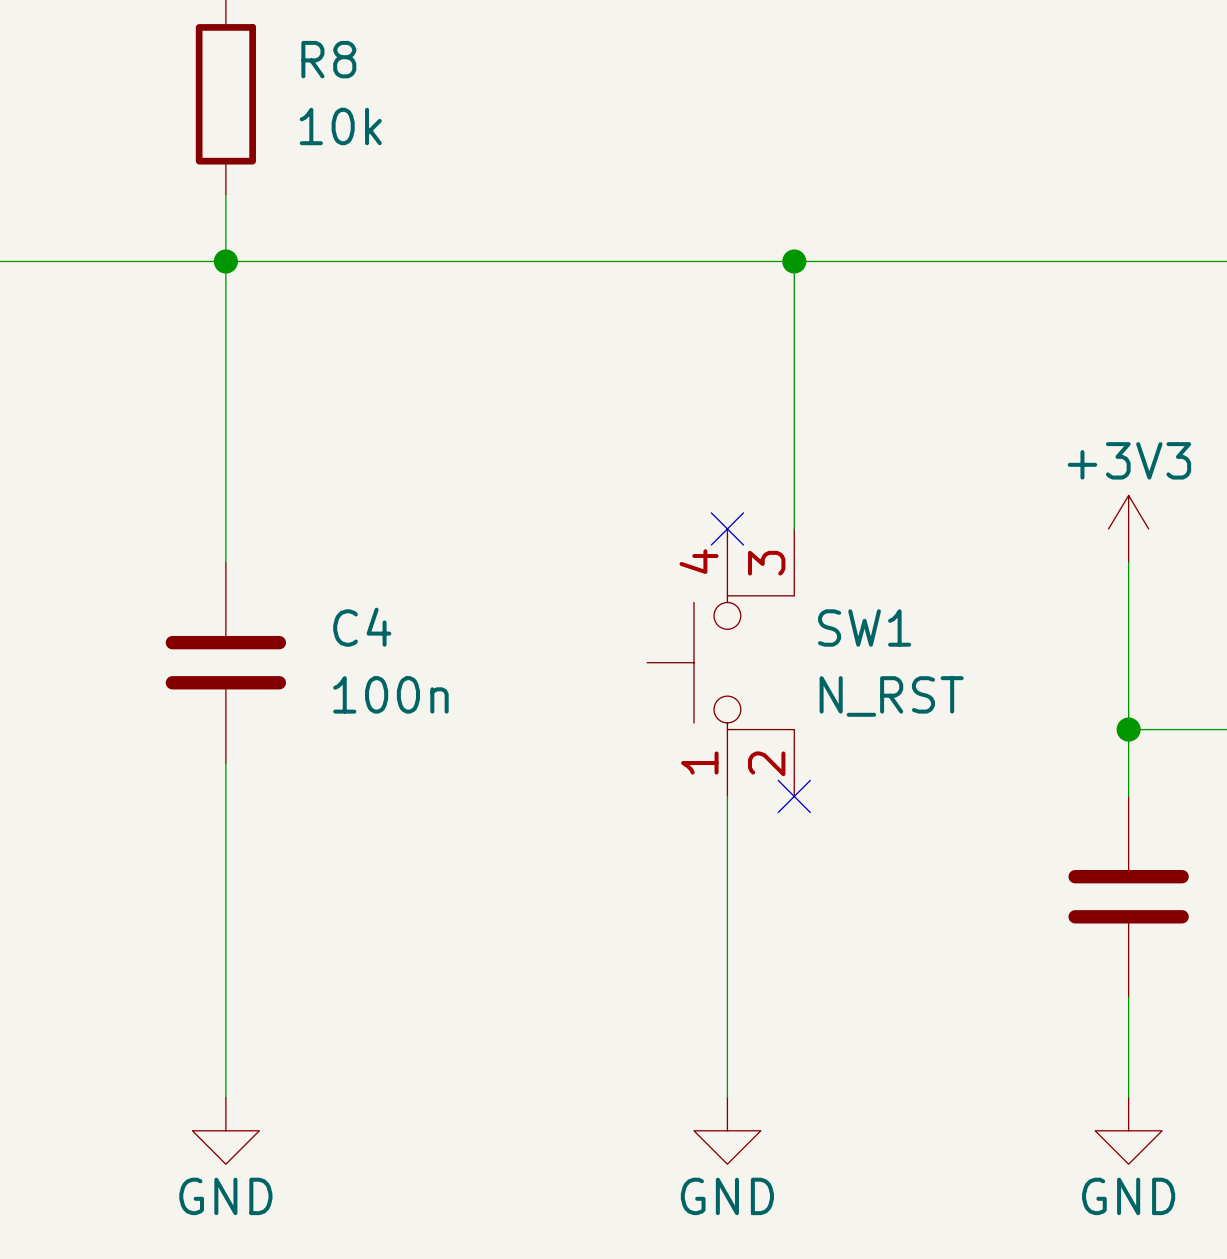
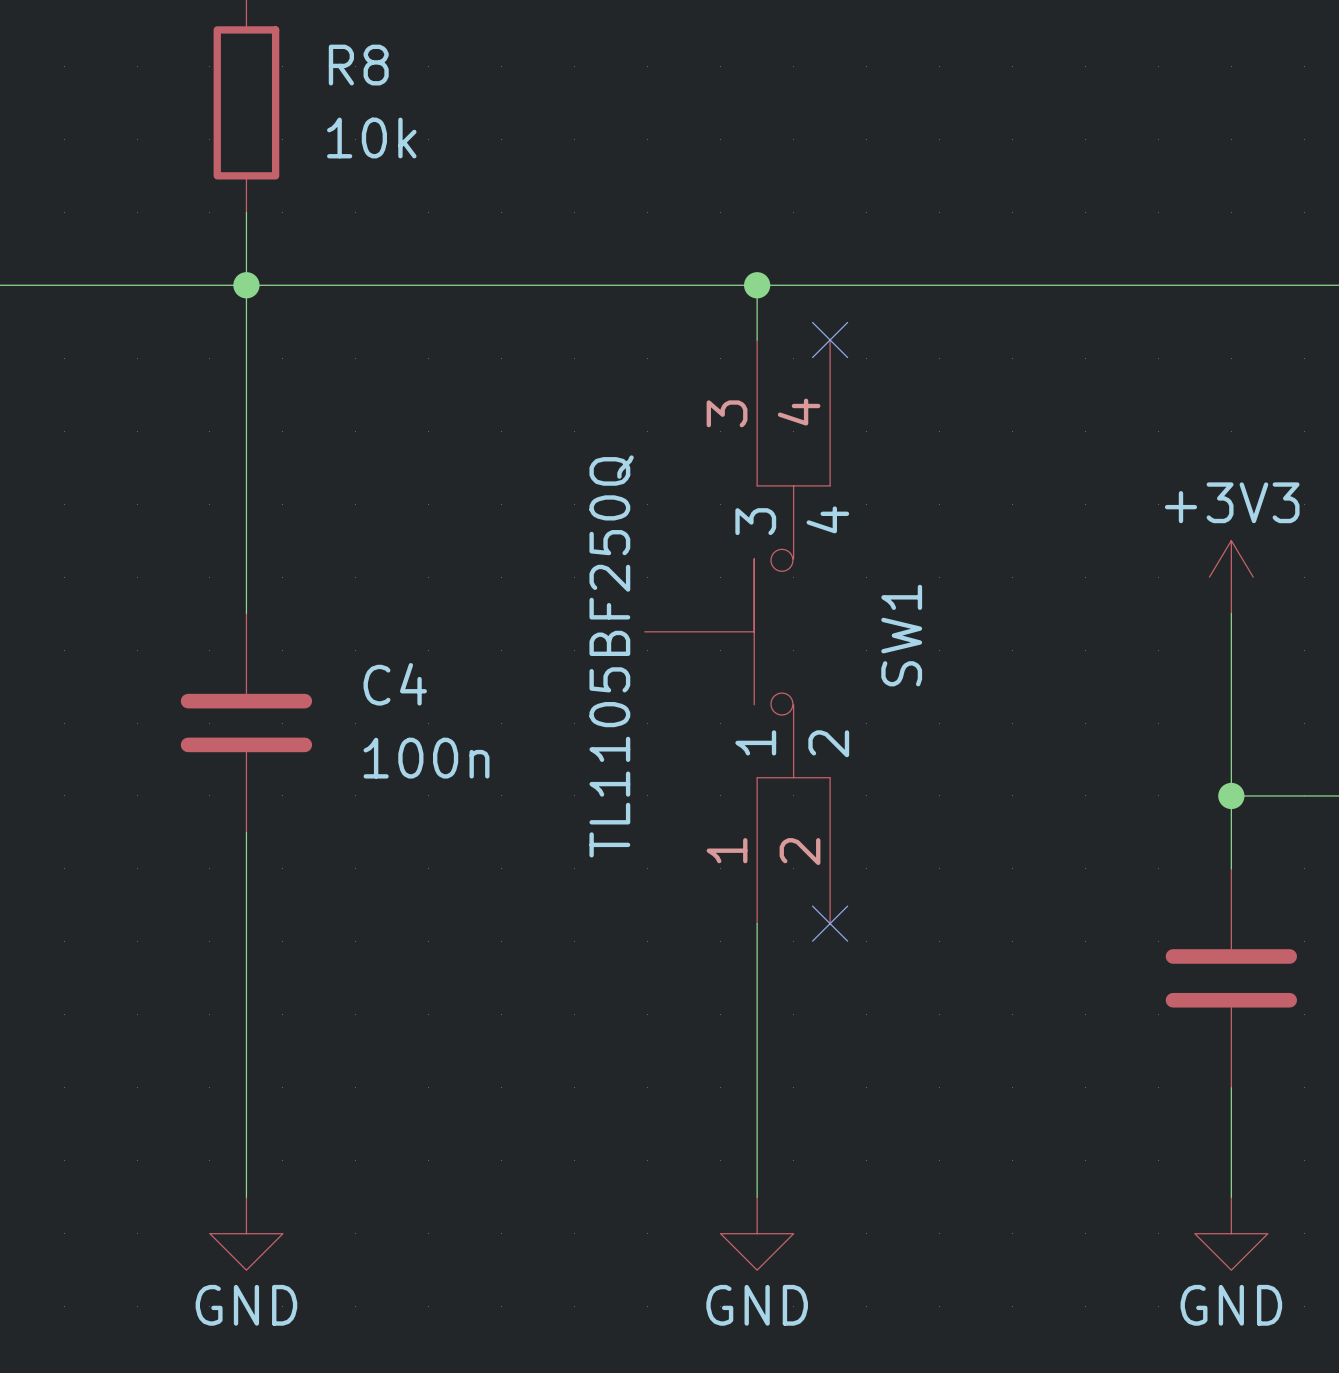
wire: none -> (757, 285) (757, 339)
wire: (794, 261) (794, 528) -> none
junction position: (794, 261) -> (757, 285)
no-connect mark: none -> (830, 339)
SW1 symbol: [647, 528, 795, 797] -> [644, 339, 831, 924]
no-connect mark: (727, 528) -> none
SW1 value: N_RST (891, 696) -> TL1105BF250Q (611, 656)
wire: (727, 796) (727, 1097) -> none
no-connect mark position: (794, 796) -> (830, 923)
wire: none -> (757, 923) (757, 1197)
power symbol position: GND (727, 1130) -> GND (757, 1233)

